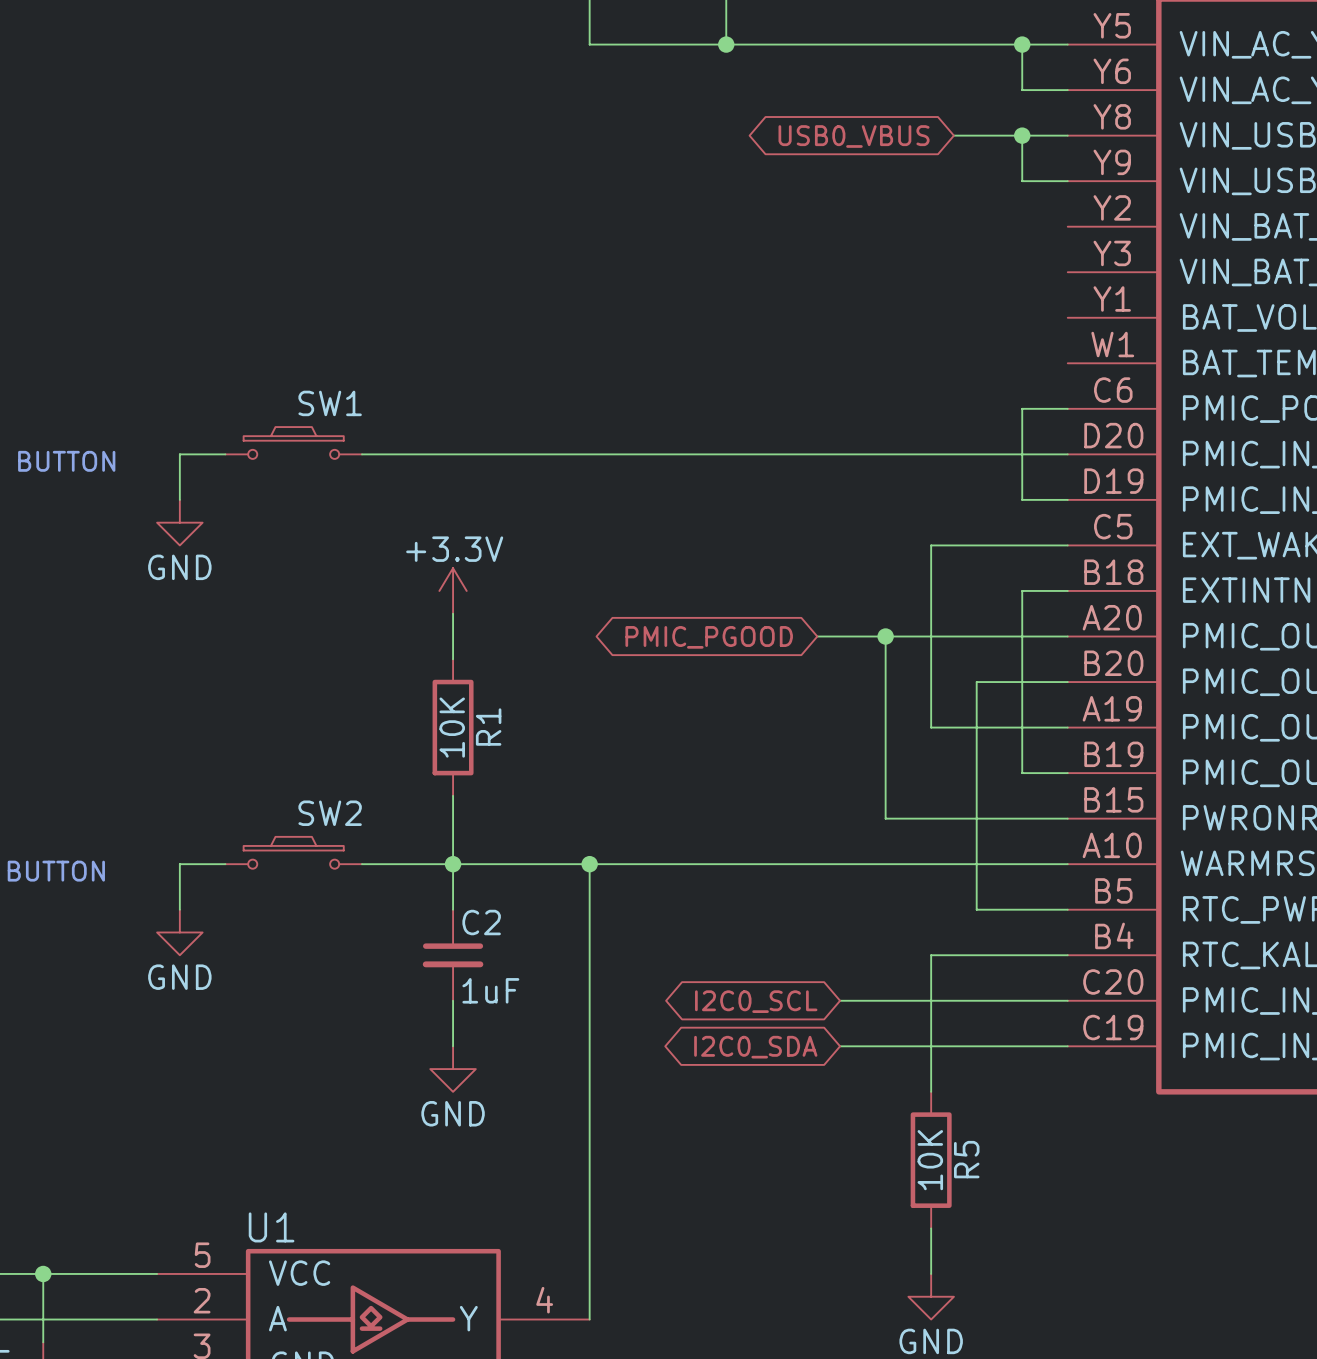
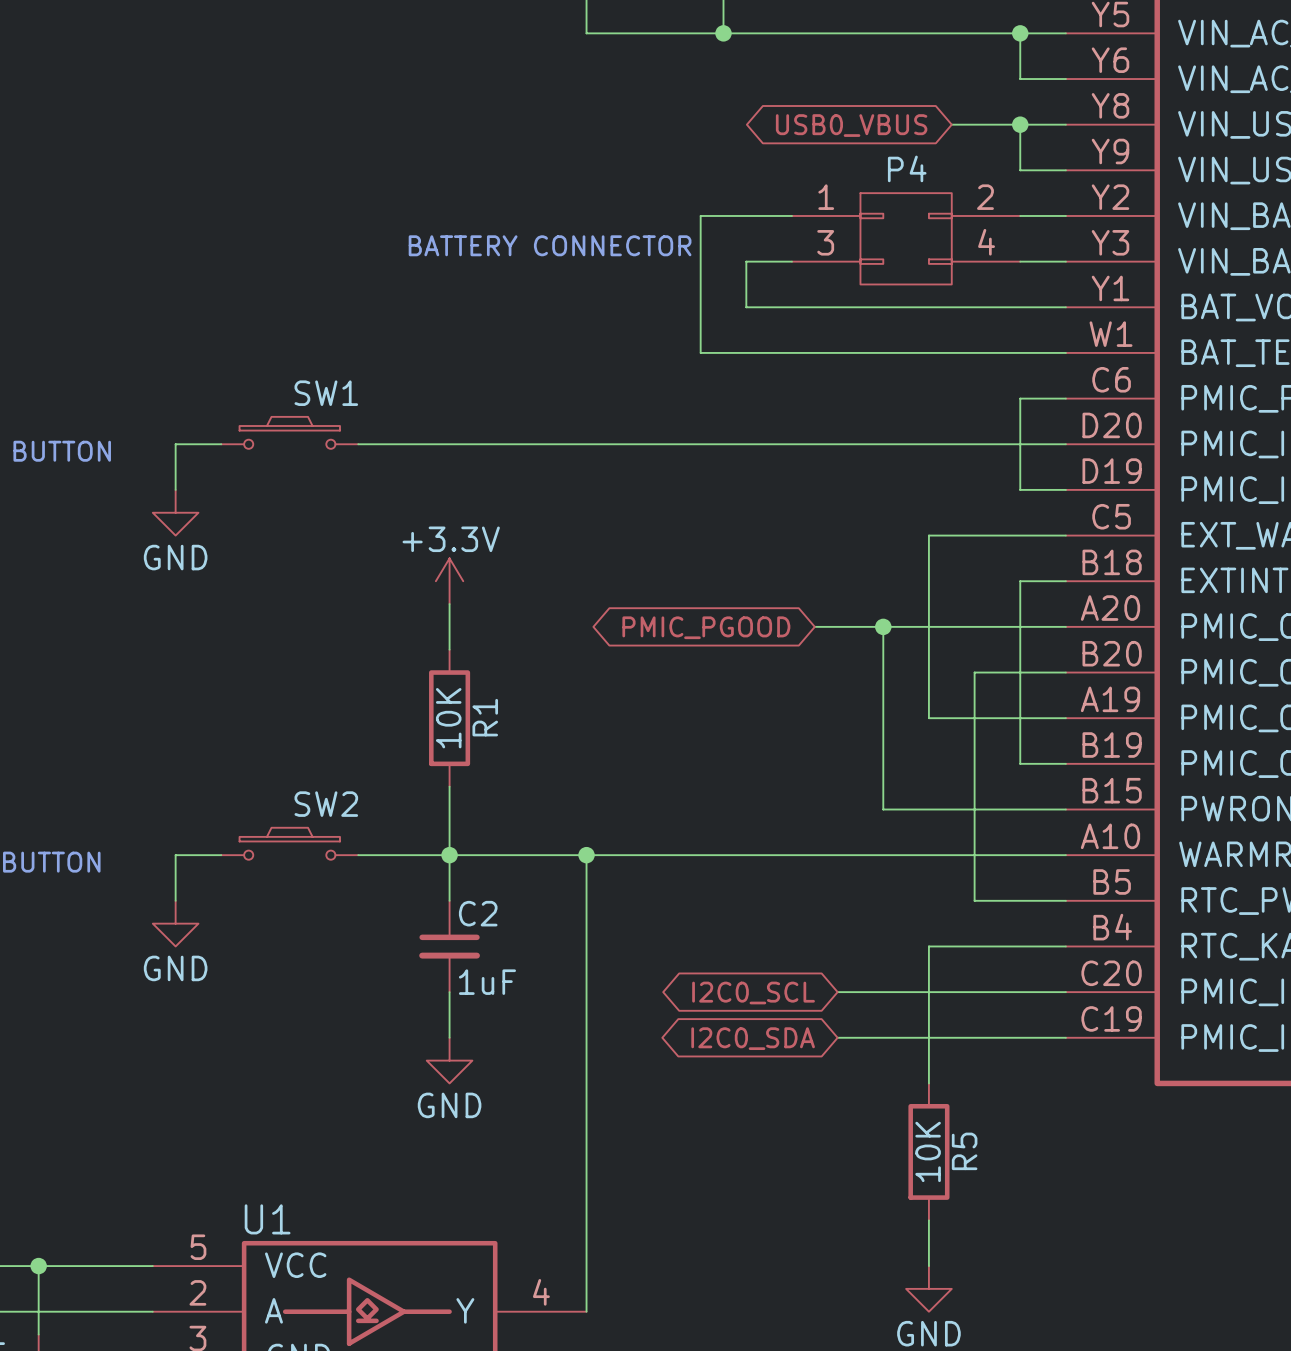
wire: none -> (791, 215) (700, 215) (700, 352) (1065, 352)
wire: none -> (1020, 215) (1065, 215)
P4: none -> (906, 238)
text: none -> BATTERY CONNECTOR (550, 245)
wire: none -> (791, 261) (746, 261) (746, 307) (1065, 307)
wire: none -> (1020, 261) (1065, 261)

